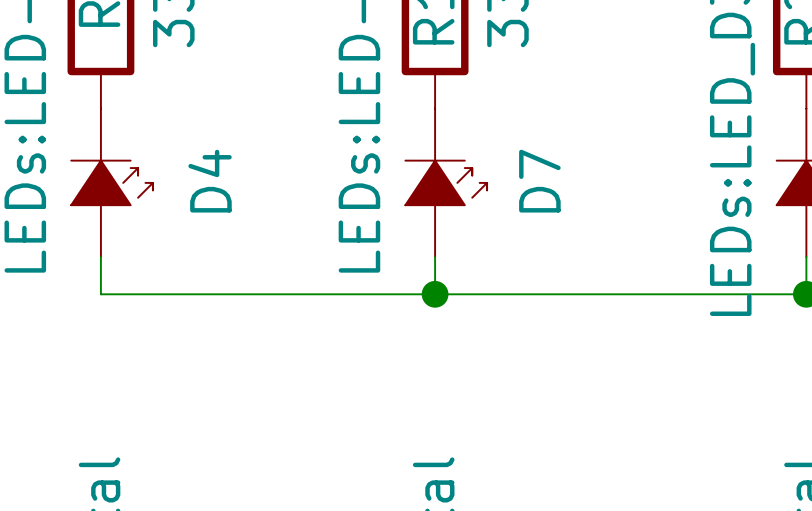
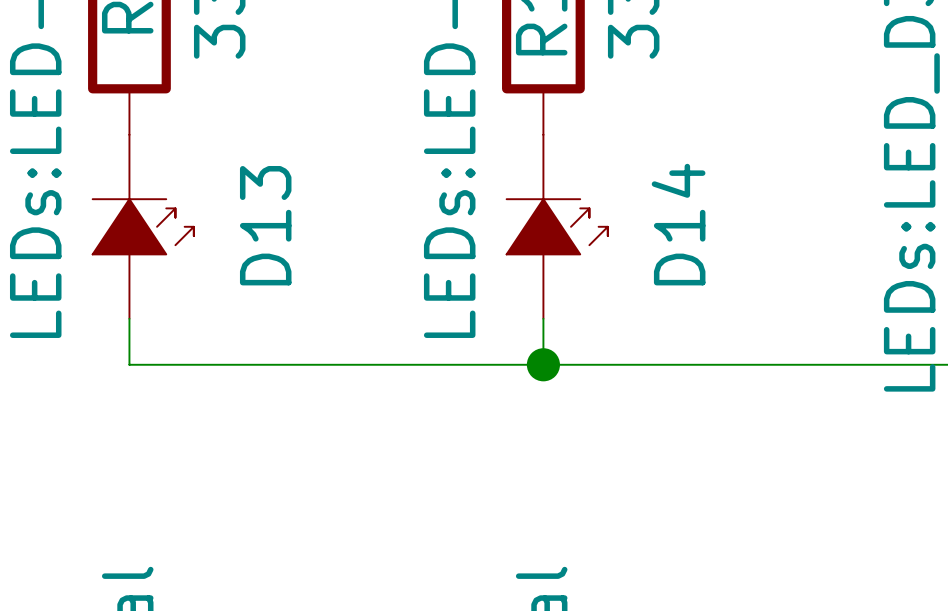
D4 name: D4 (210, 181) -> D13 (265, 225)
D7 name: D7 (539, 181) -> D14 (678, 224)

